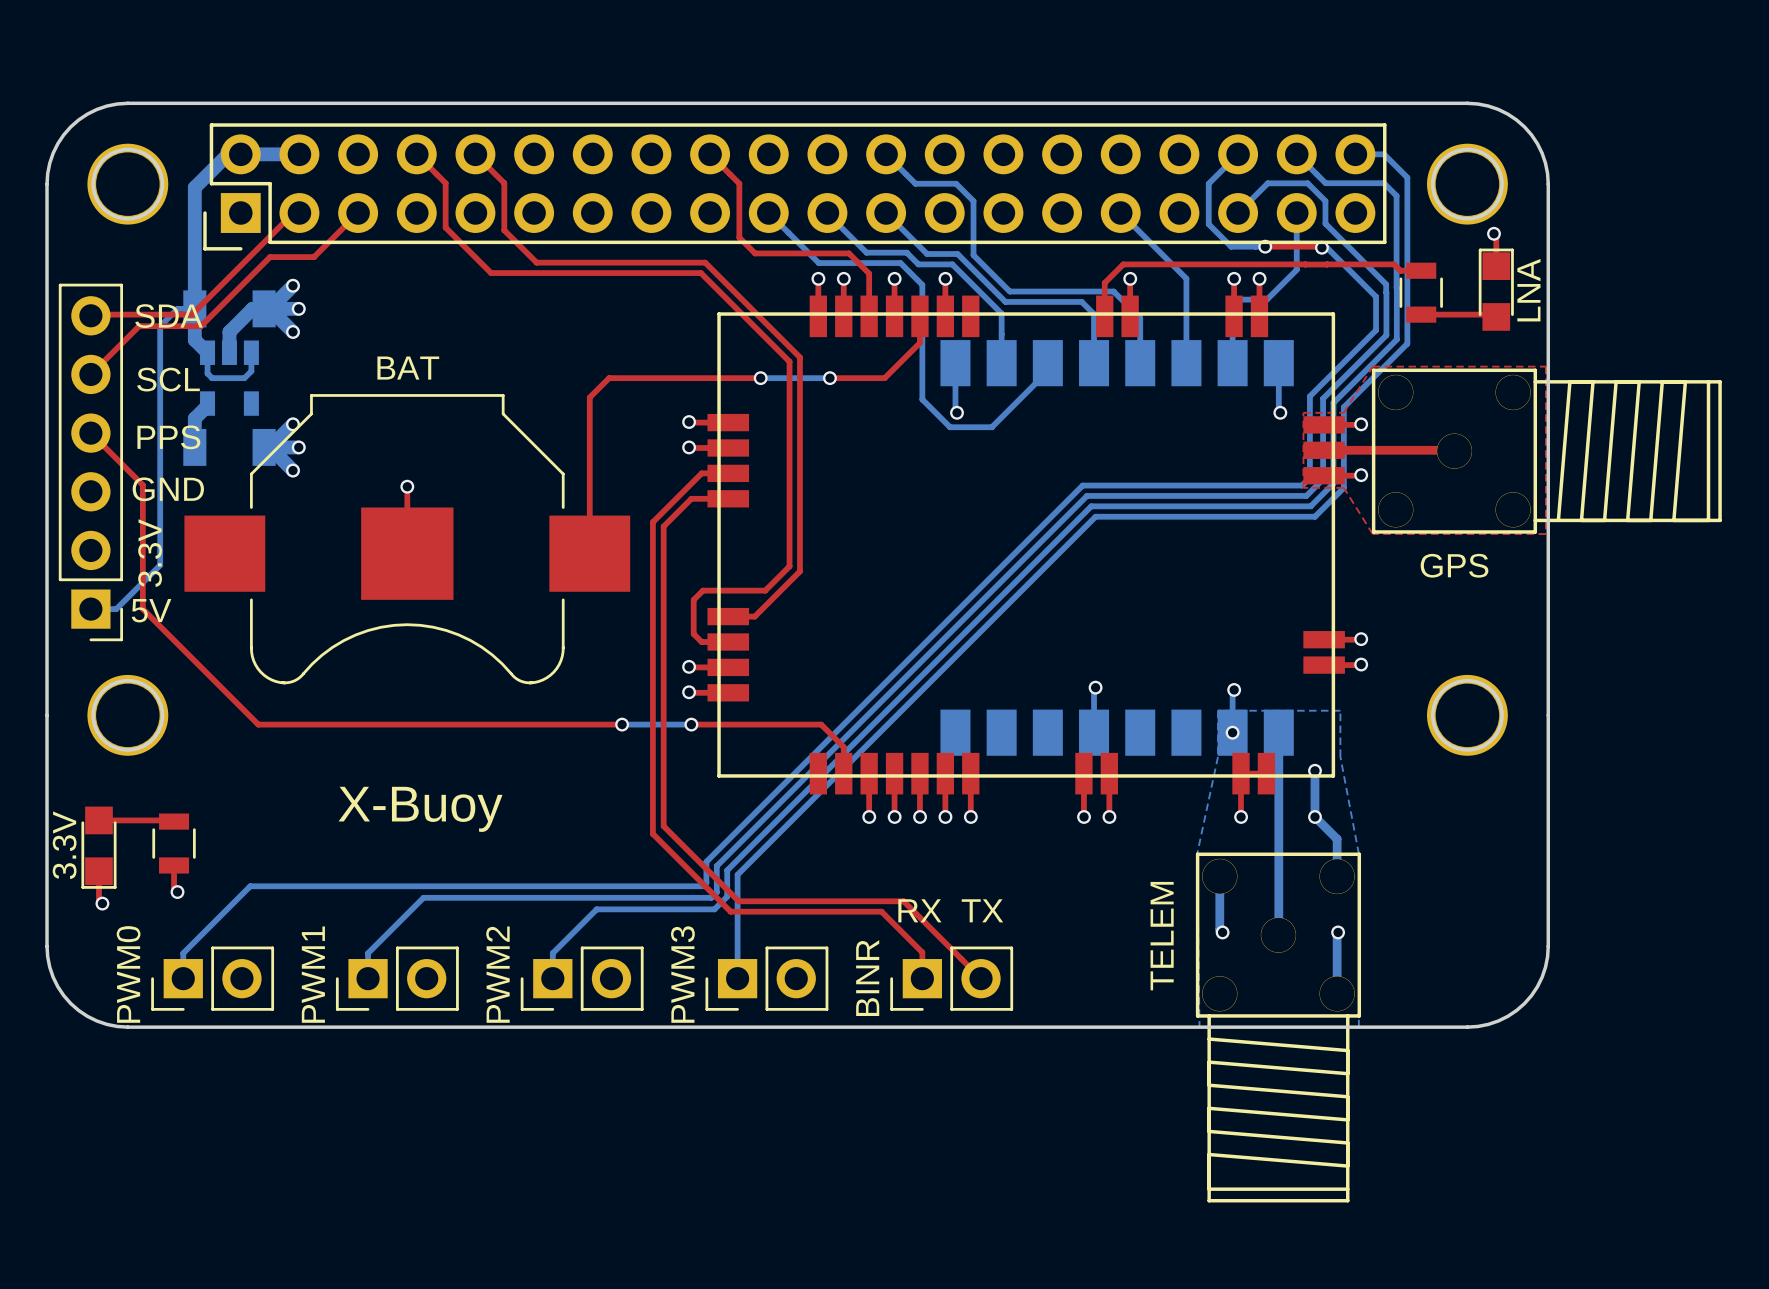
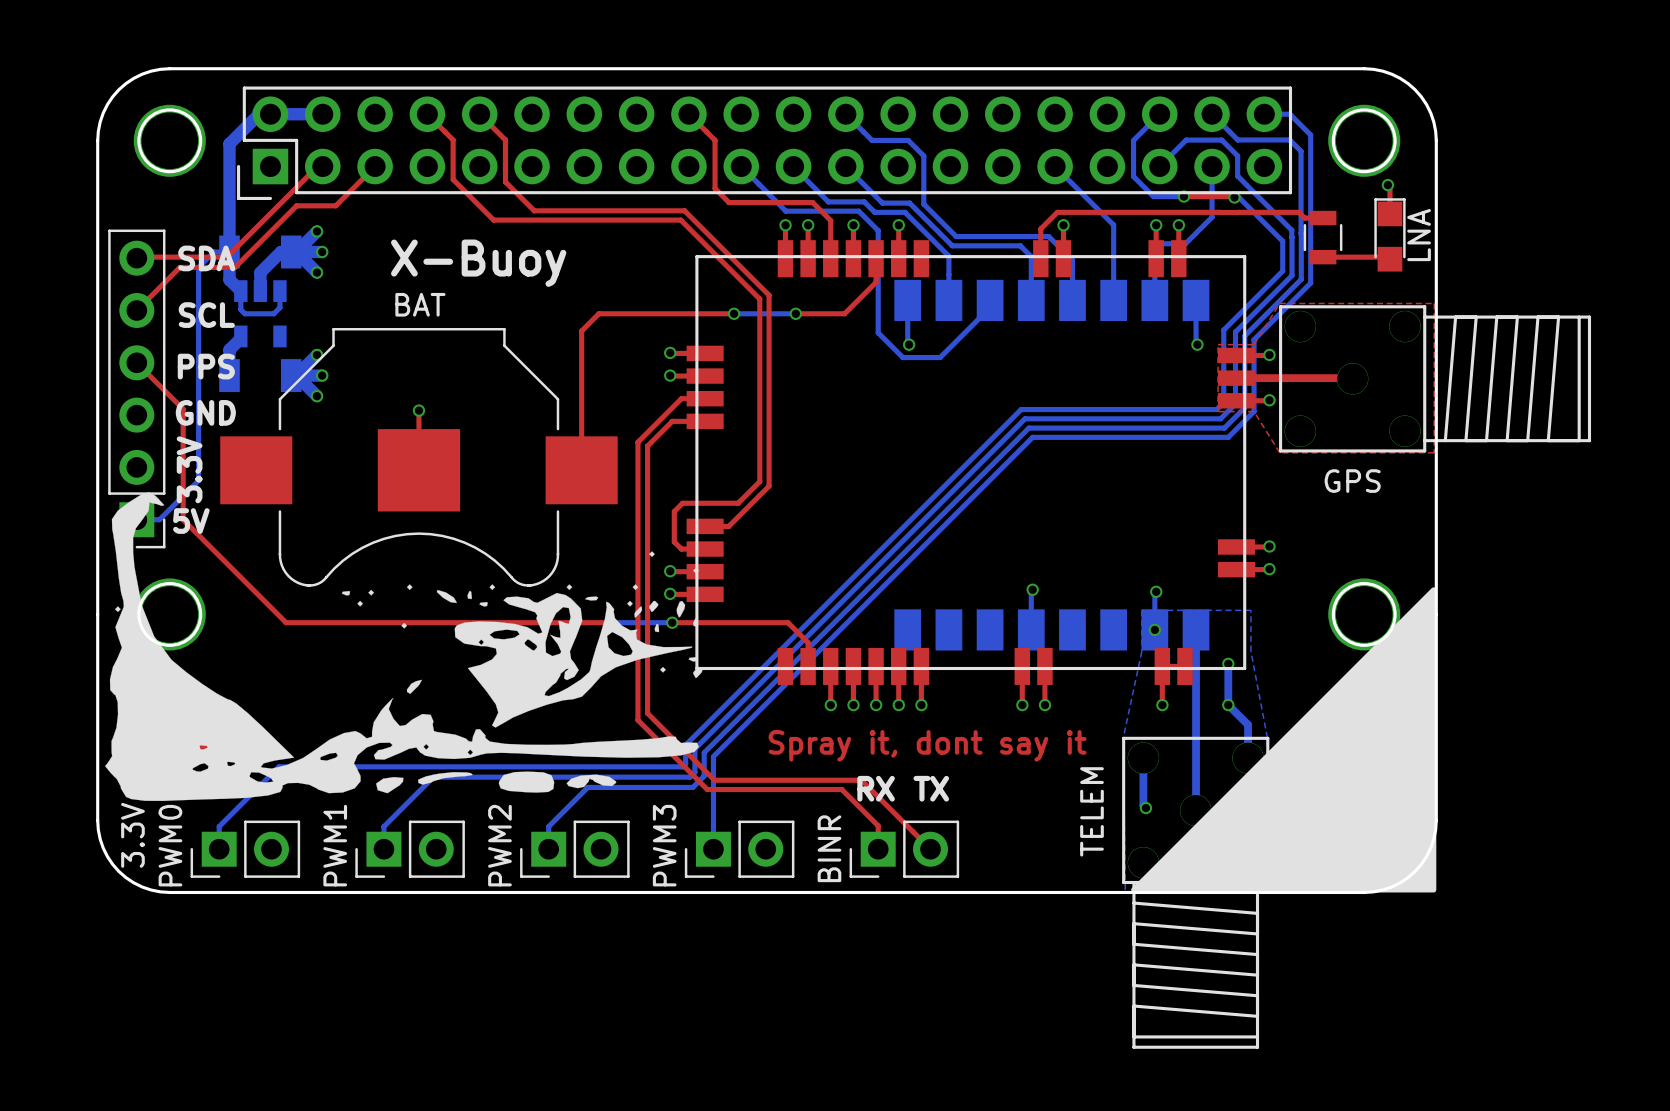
drawing: none -> [105, 492, 703, 802]
drawing: none -> [1131, 587, 1437, 893]
text position: X-Buoy (420, 809) -> X-Buoy (478, 263)
3.3V name position: 3.3V (64, 845) -> 3.3V (132, 835)
text: none -> Spray it, dont say it (927, 745)

